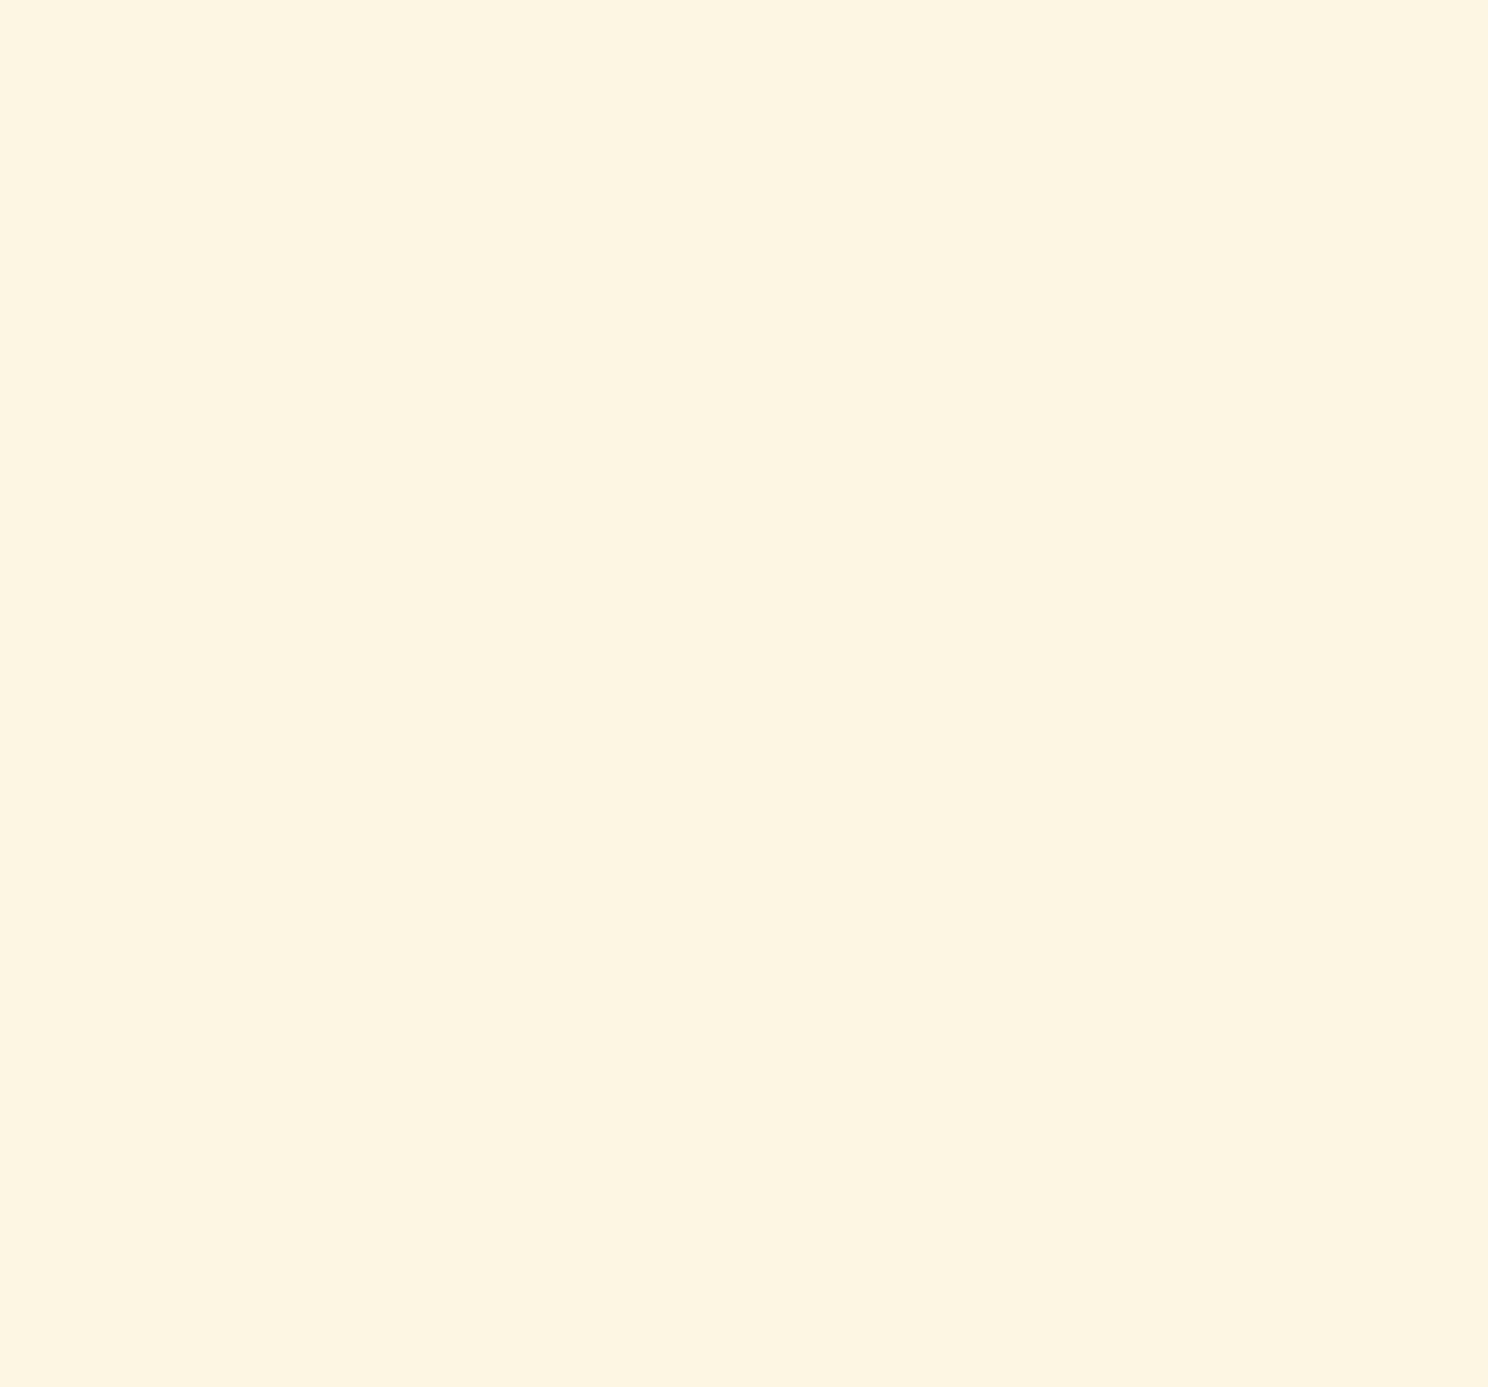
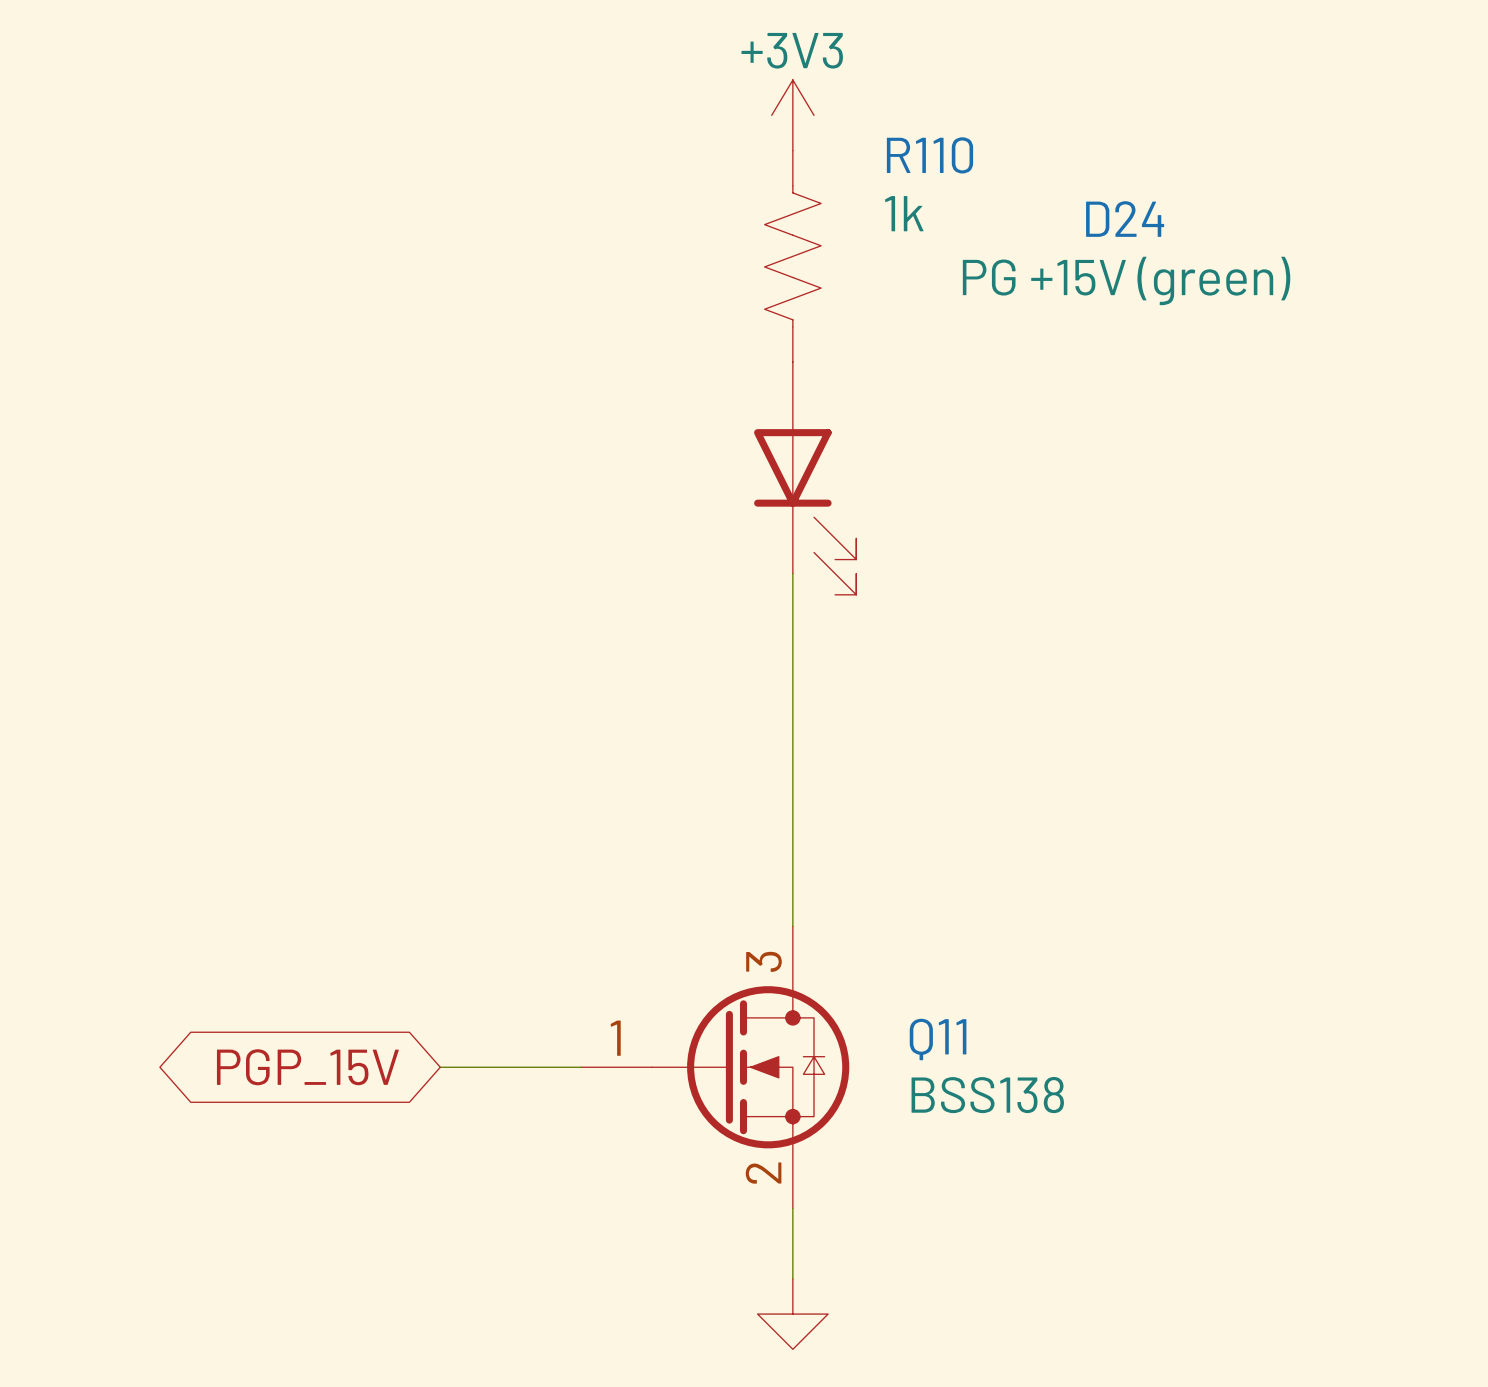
power symbol: none -> +3V3 (792, 115)
R110: none -> 1k (792, 256)
D24: none -> PG +15V (green) (805, 478)
wire: none -> (792, 573) (792, 926)
global label: none -> PGP_15V (307, 1067)
wire: none -> (440, 1067) (581, 1067)
Q11: none -> BSS138 (715, 1067)
wire: none -> (792, 1208) (792, 1278)
power symbol: none -> (792, 1314)

